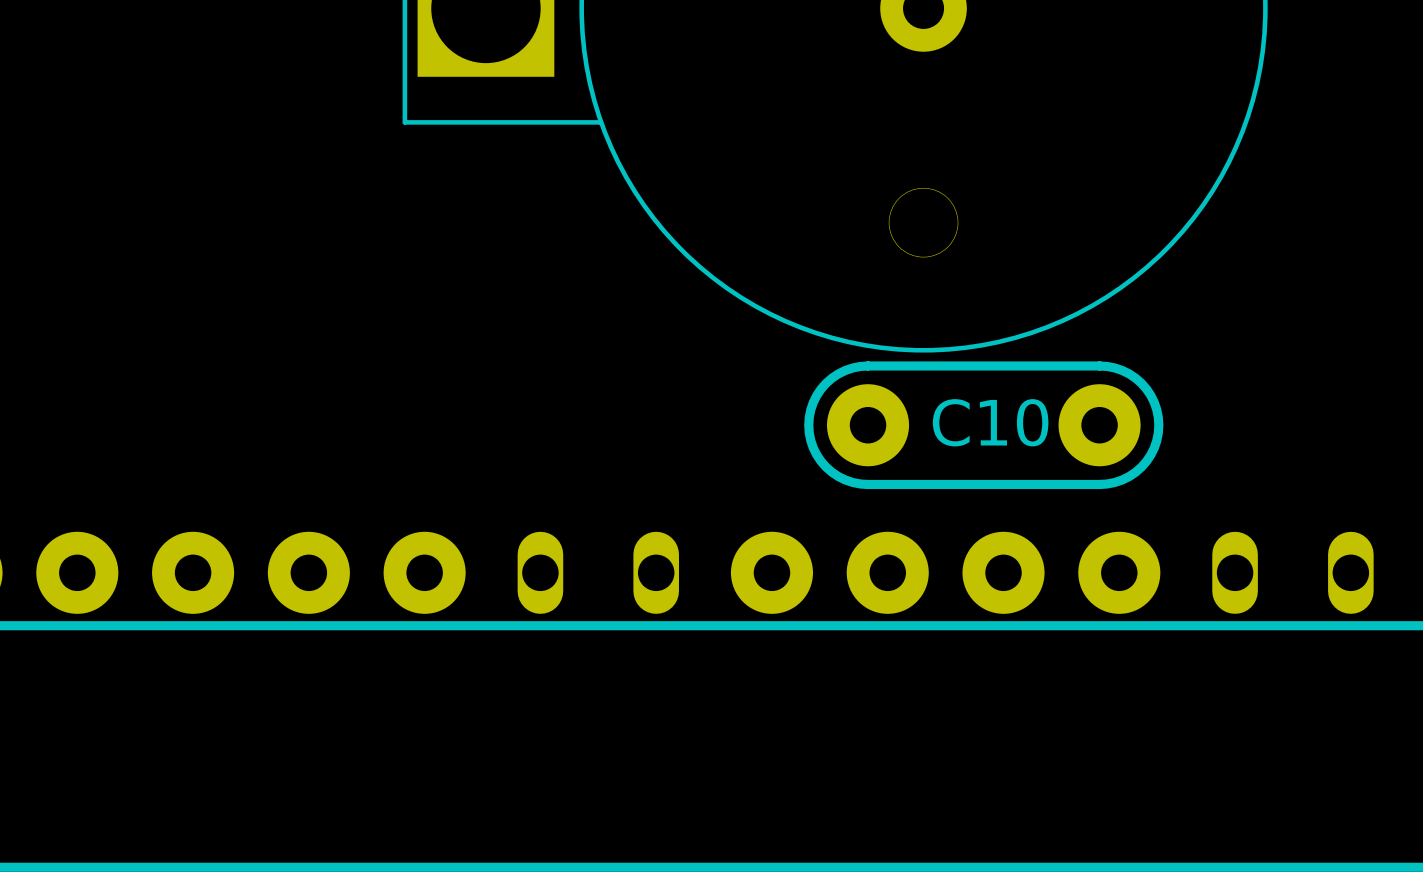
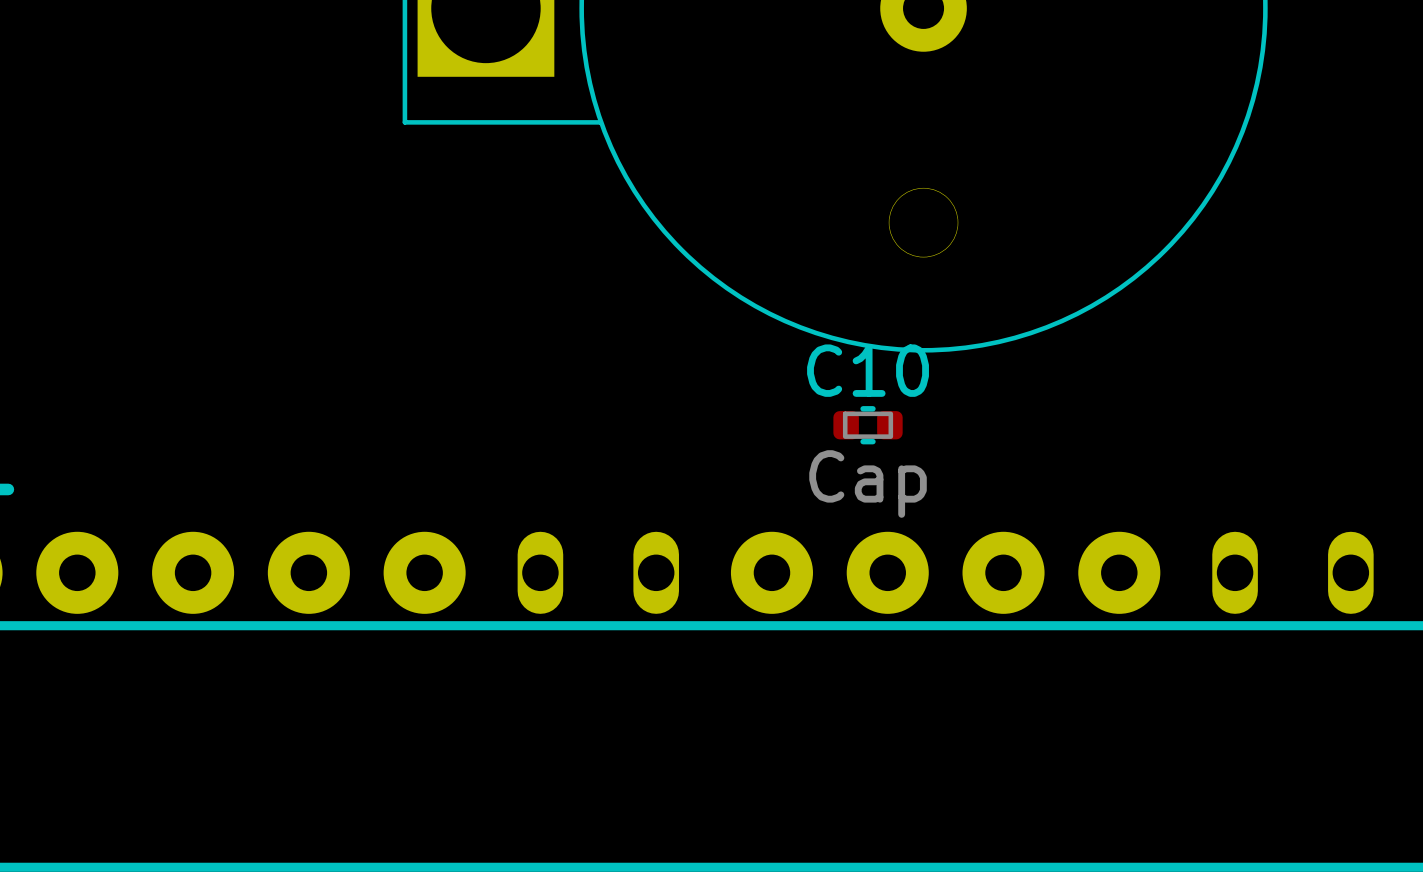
C10 footprint: [804, 361, 1164, 490] -> [833, 406, 903, 445]
C10 value: none -> Cap (868, 483)

